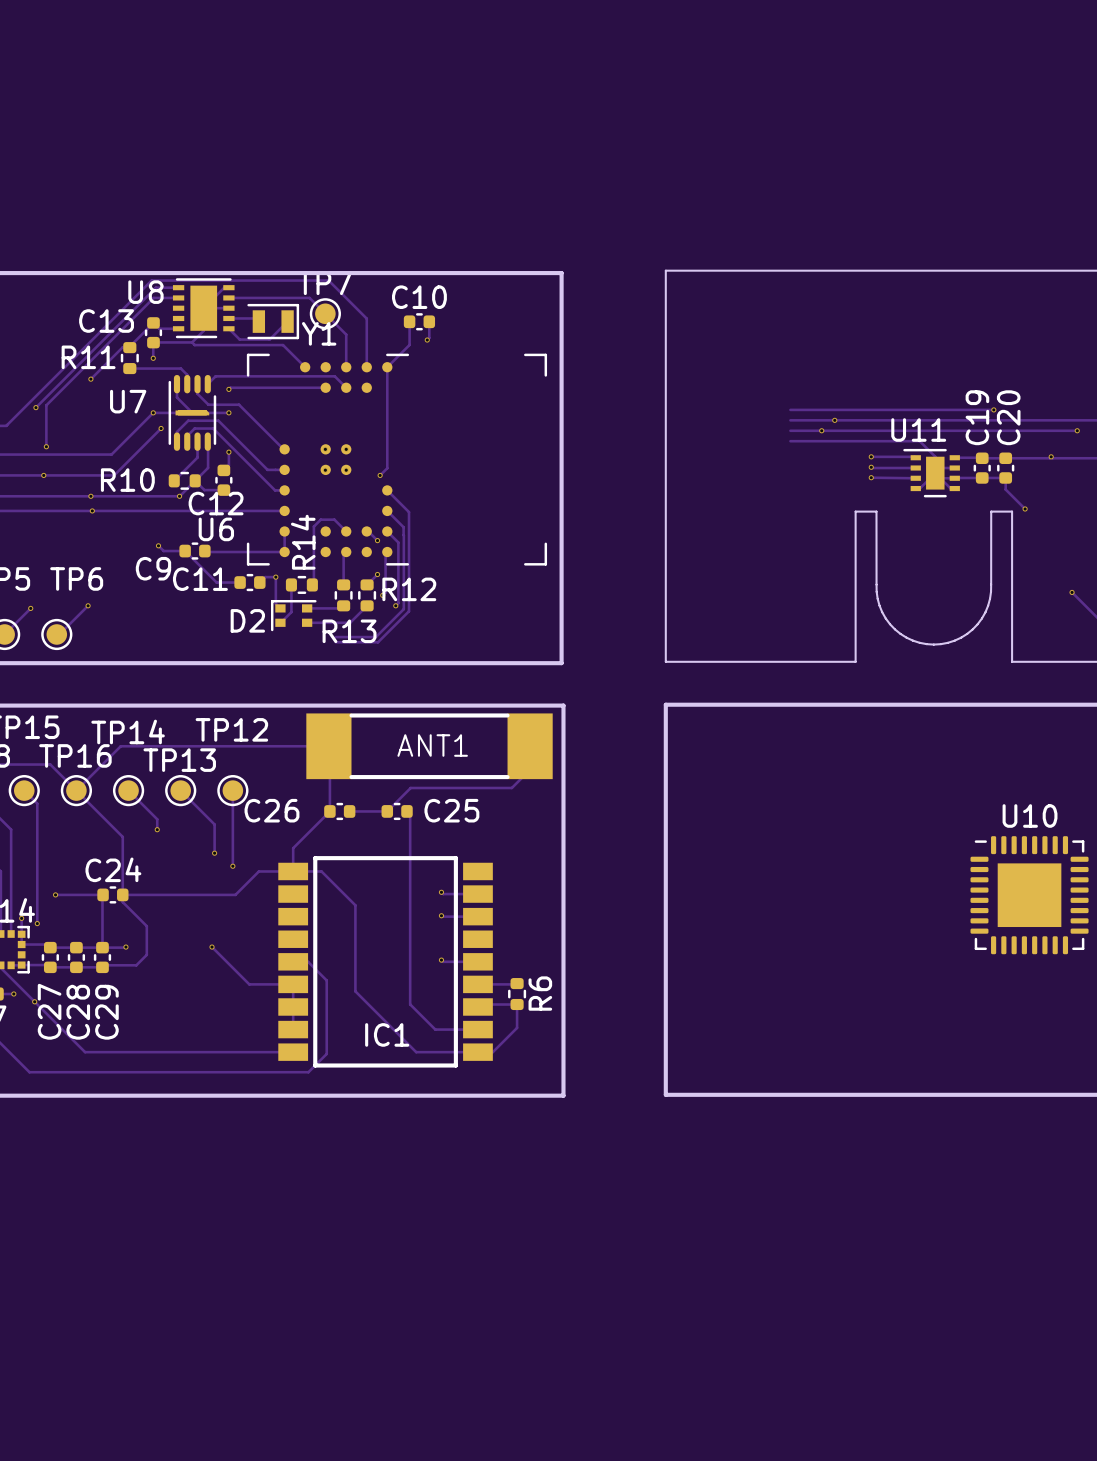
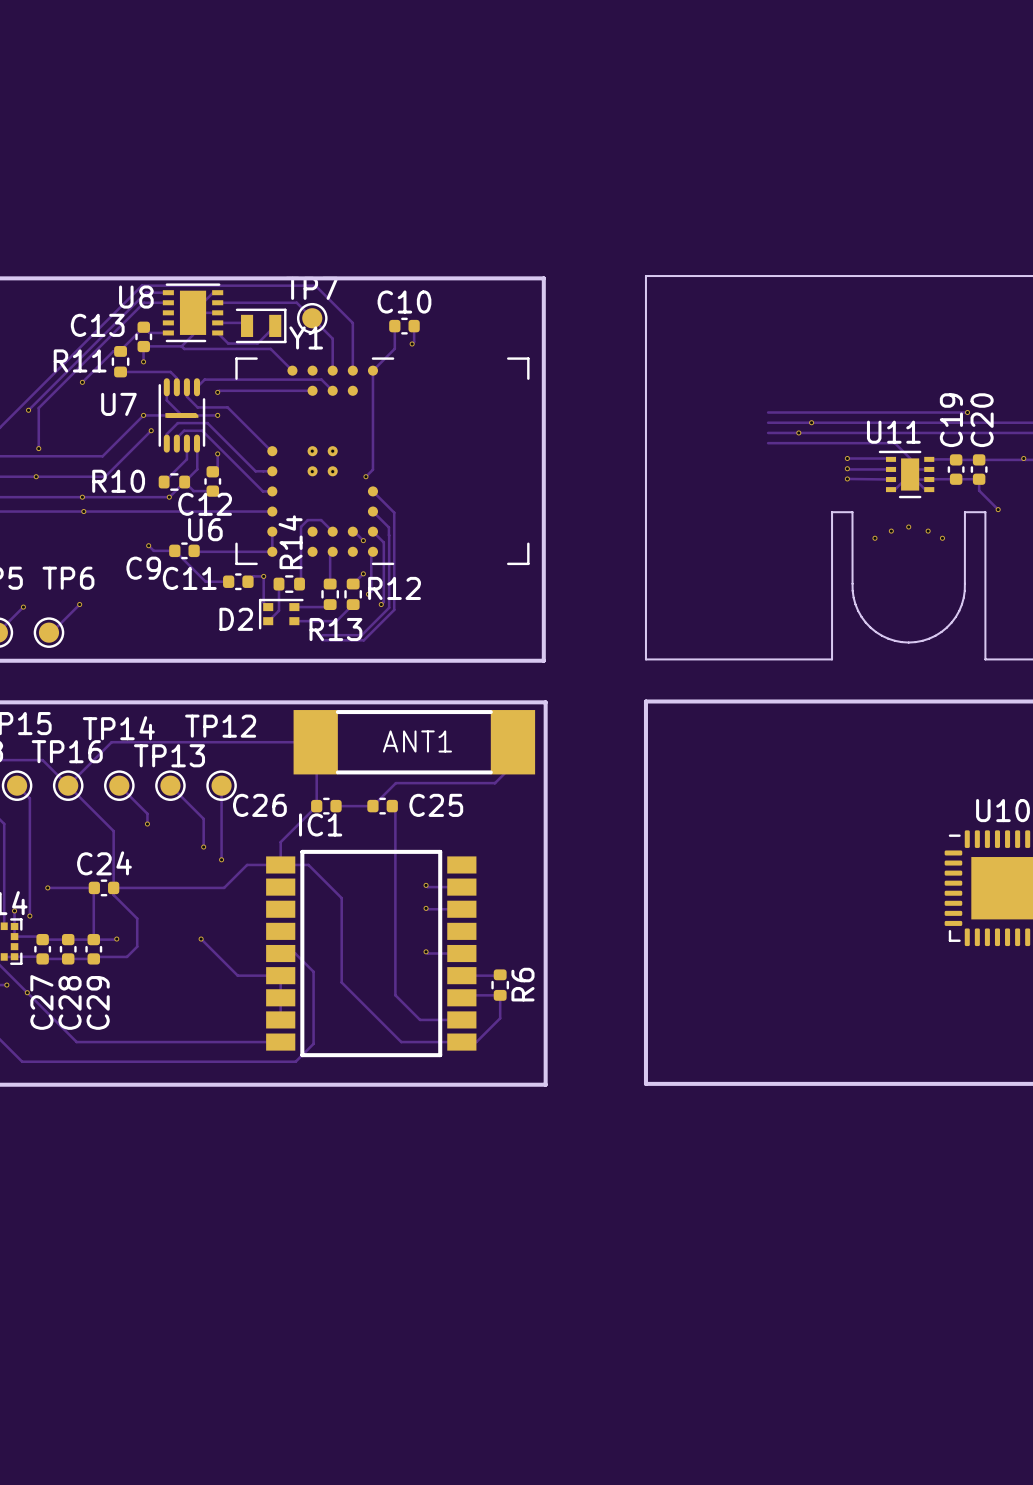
via: none -> (908, 527)
via: none -> (891, 531)
via: none -> (928, 531)
via: none -> (874, 538)
via: none -> (942, 538)
IC1 name position: IC1 (387, 1034) -> IC1 (320, 824)

